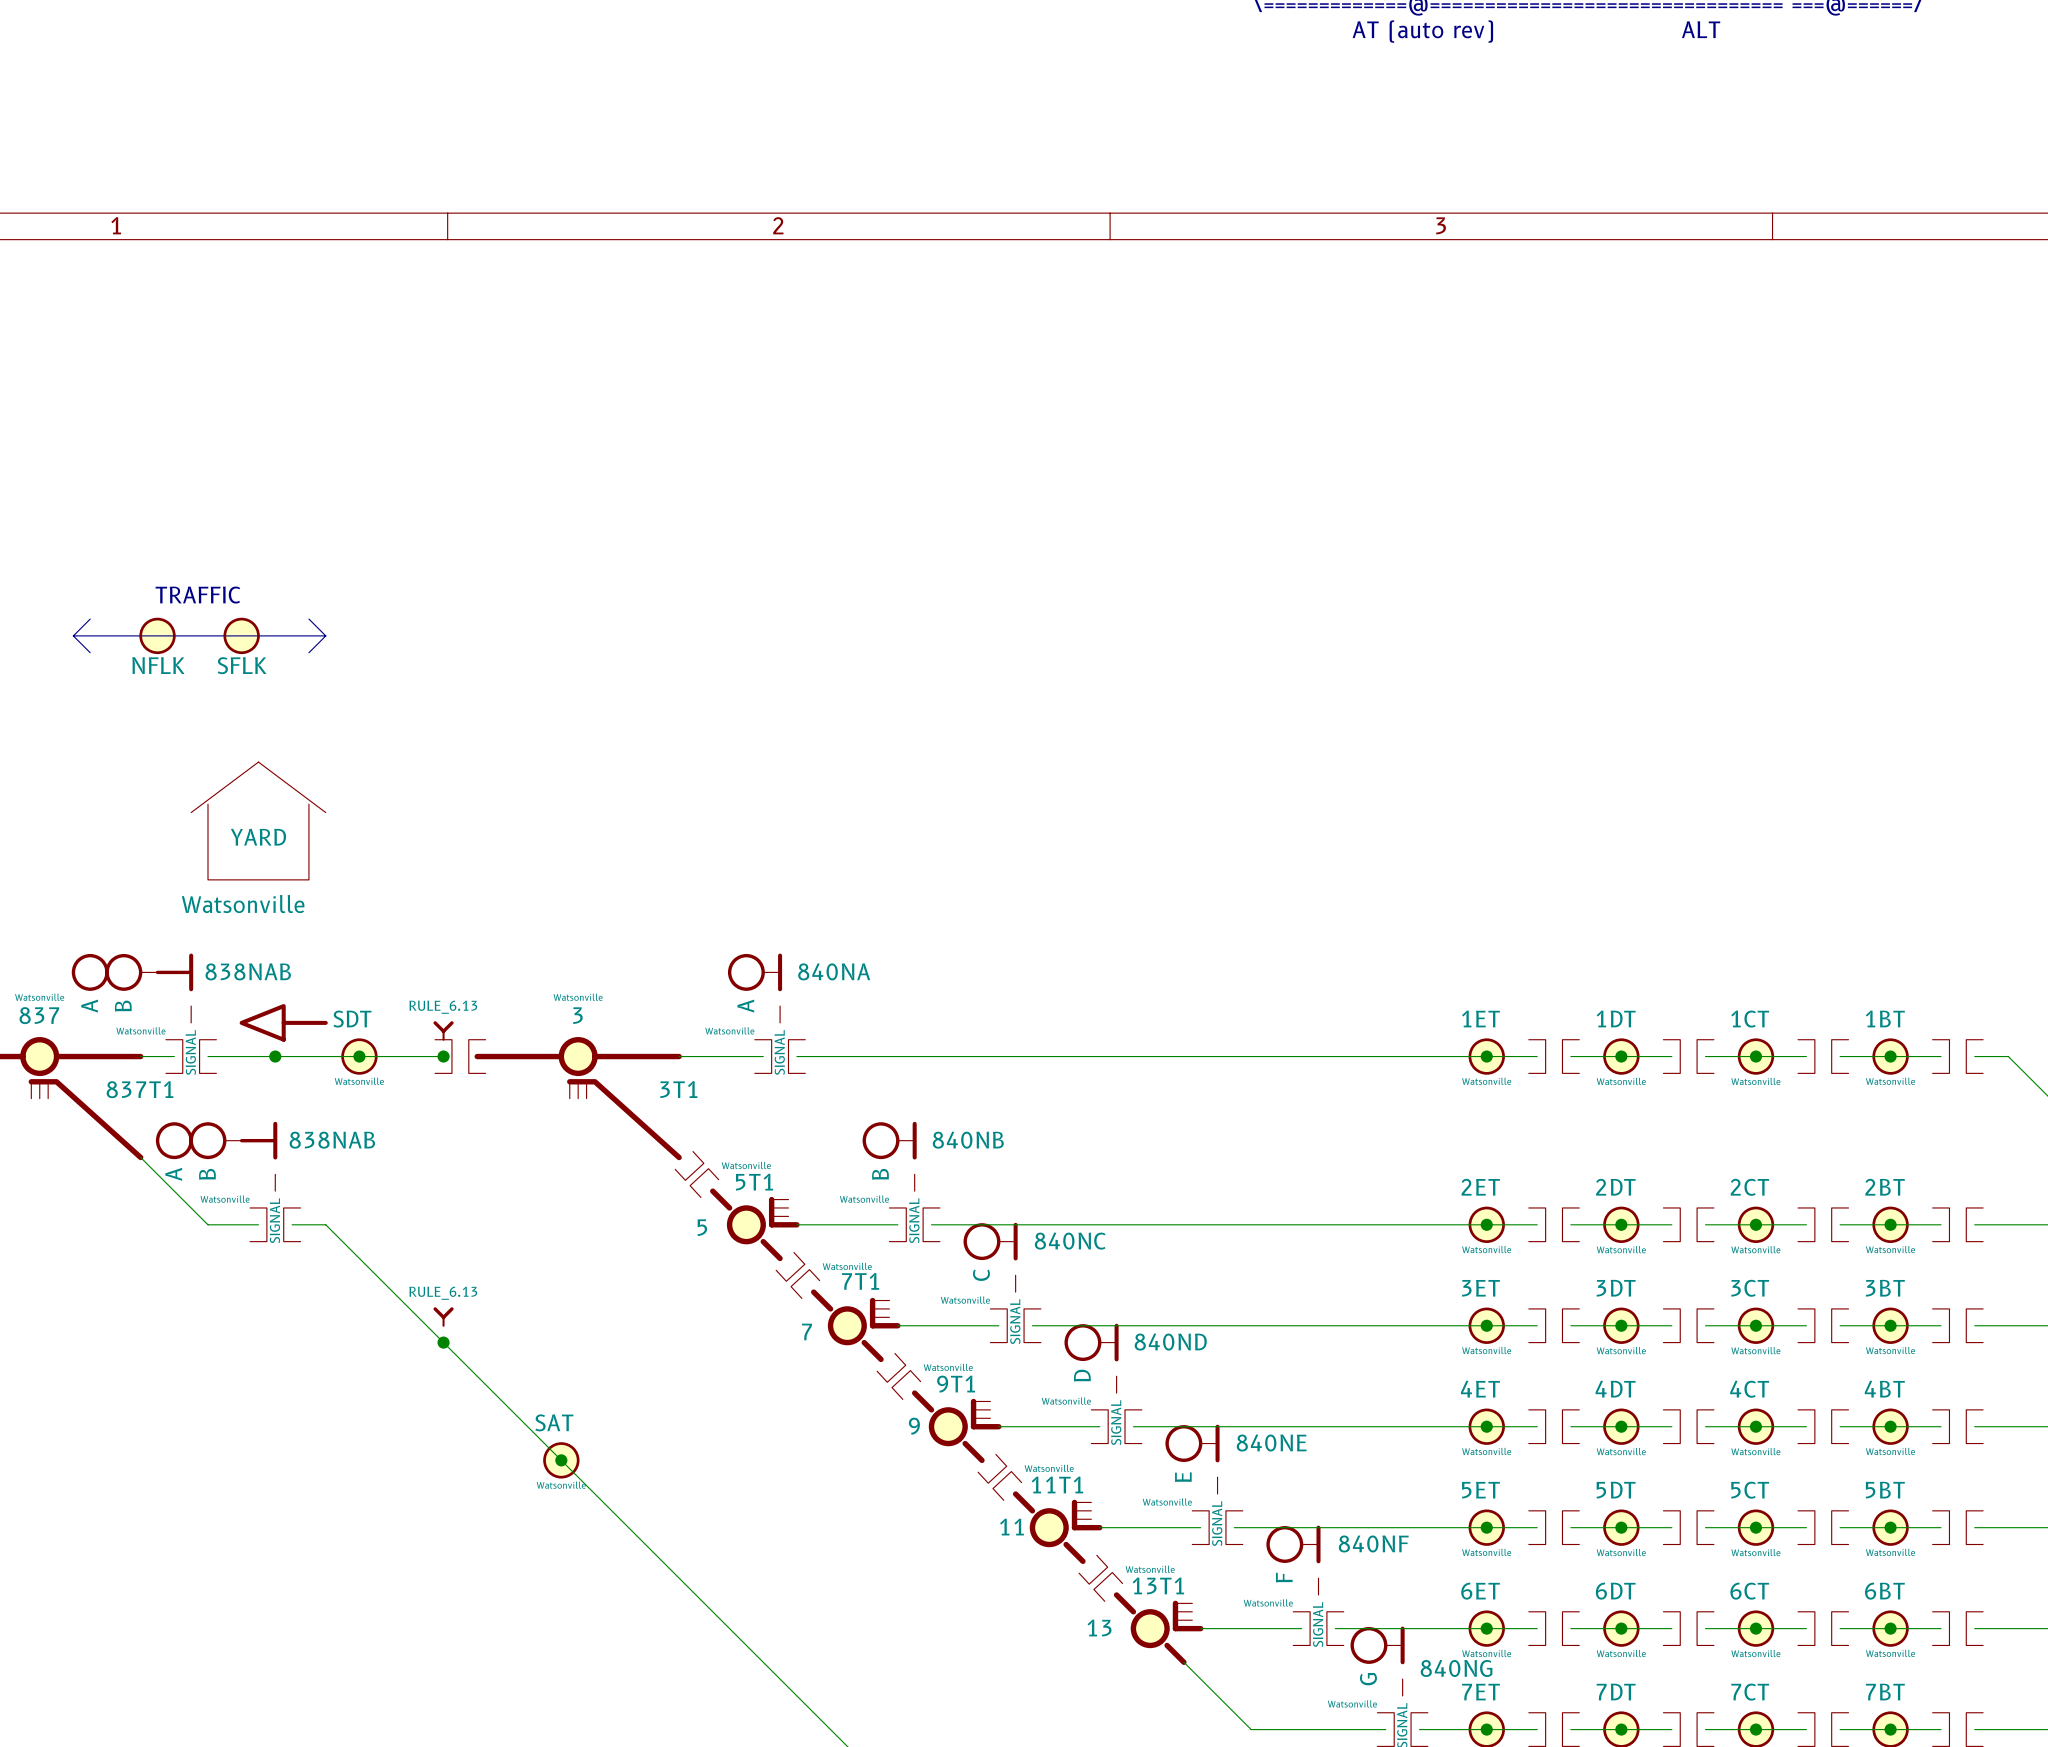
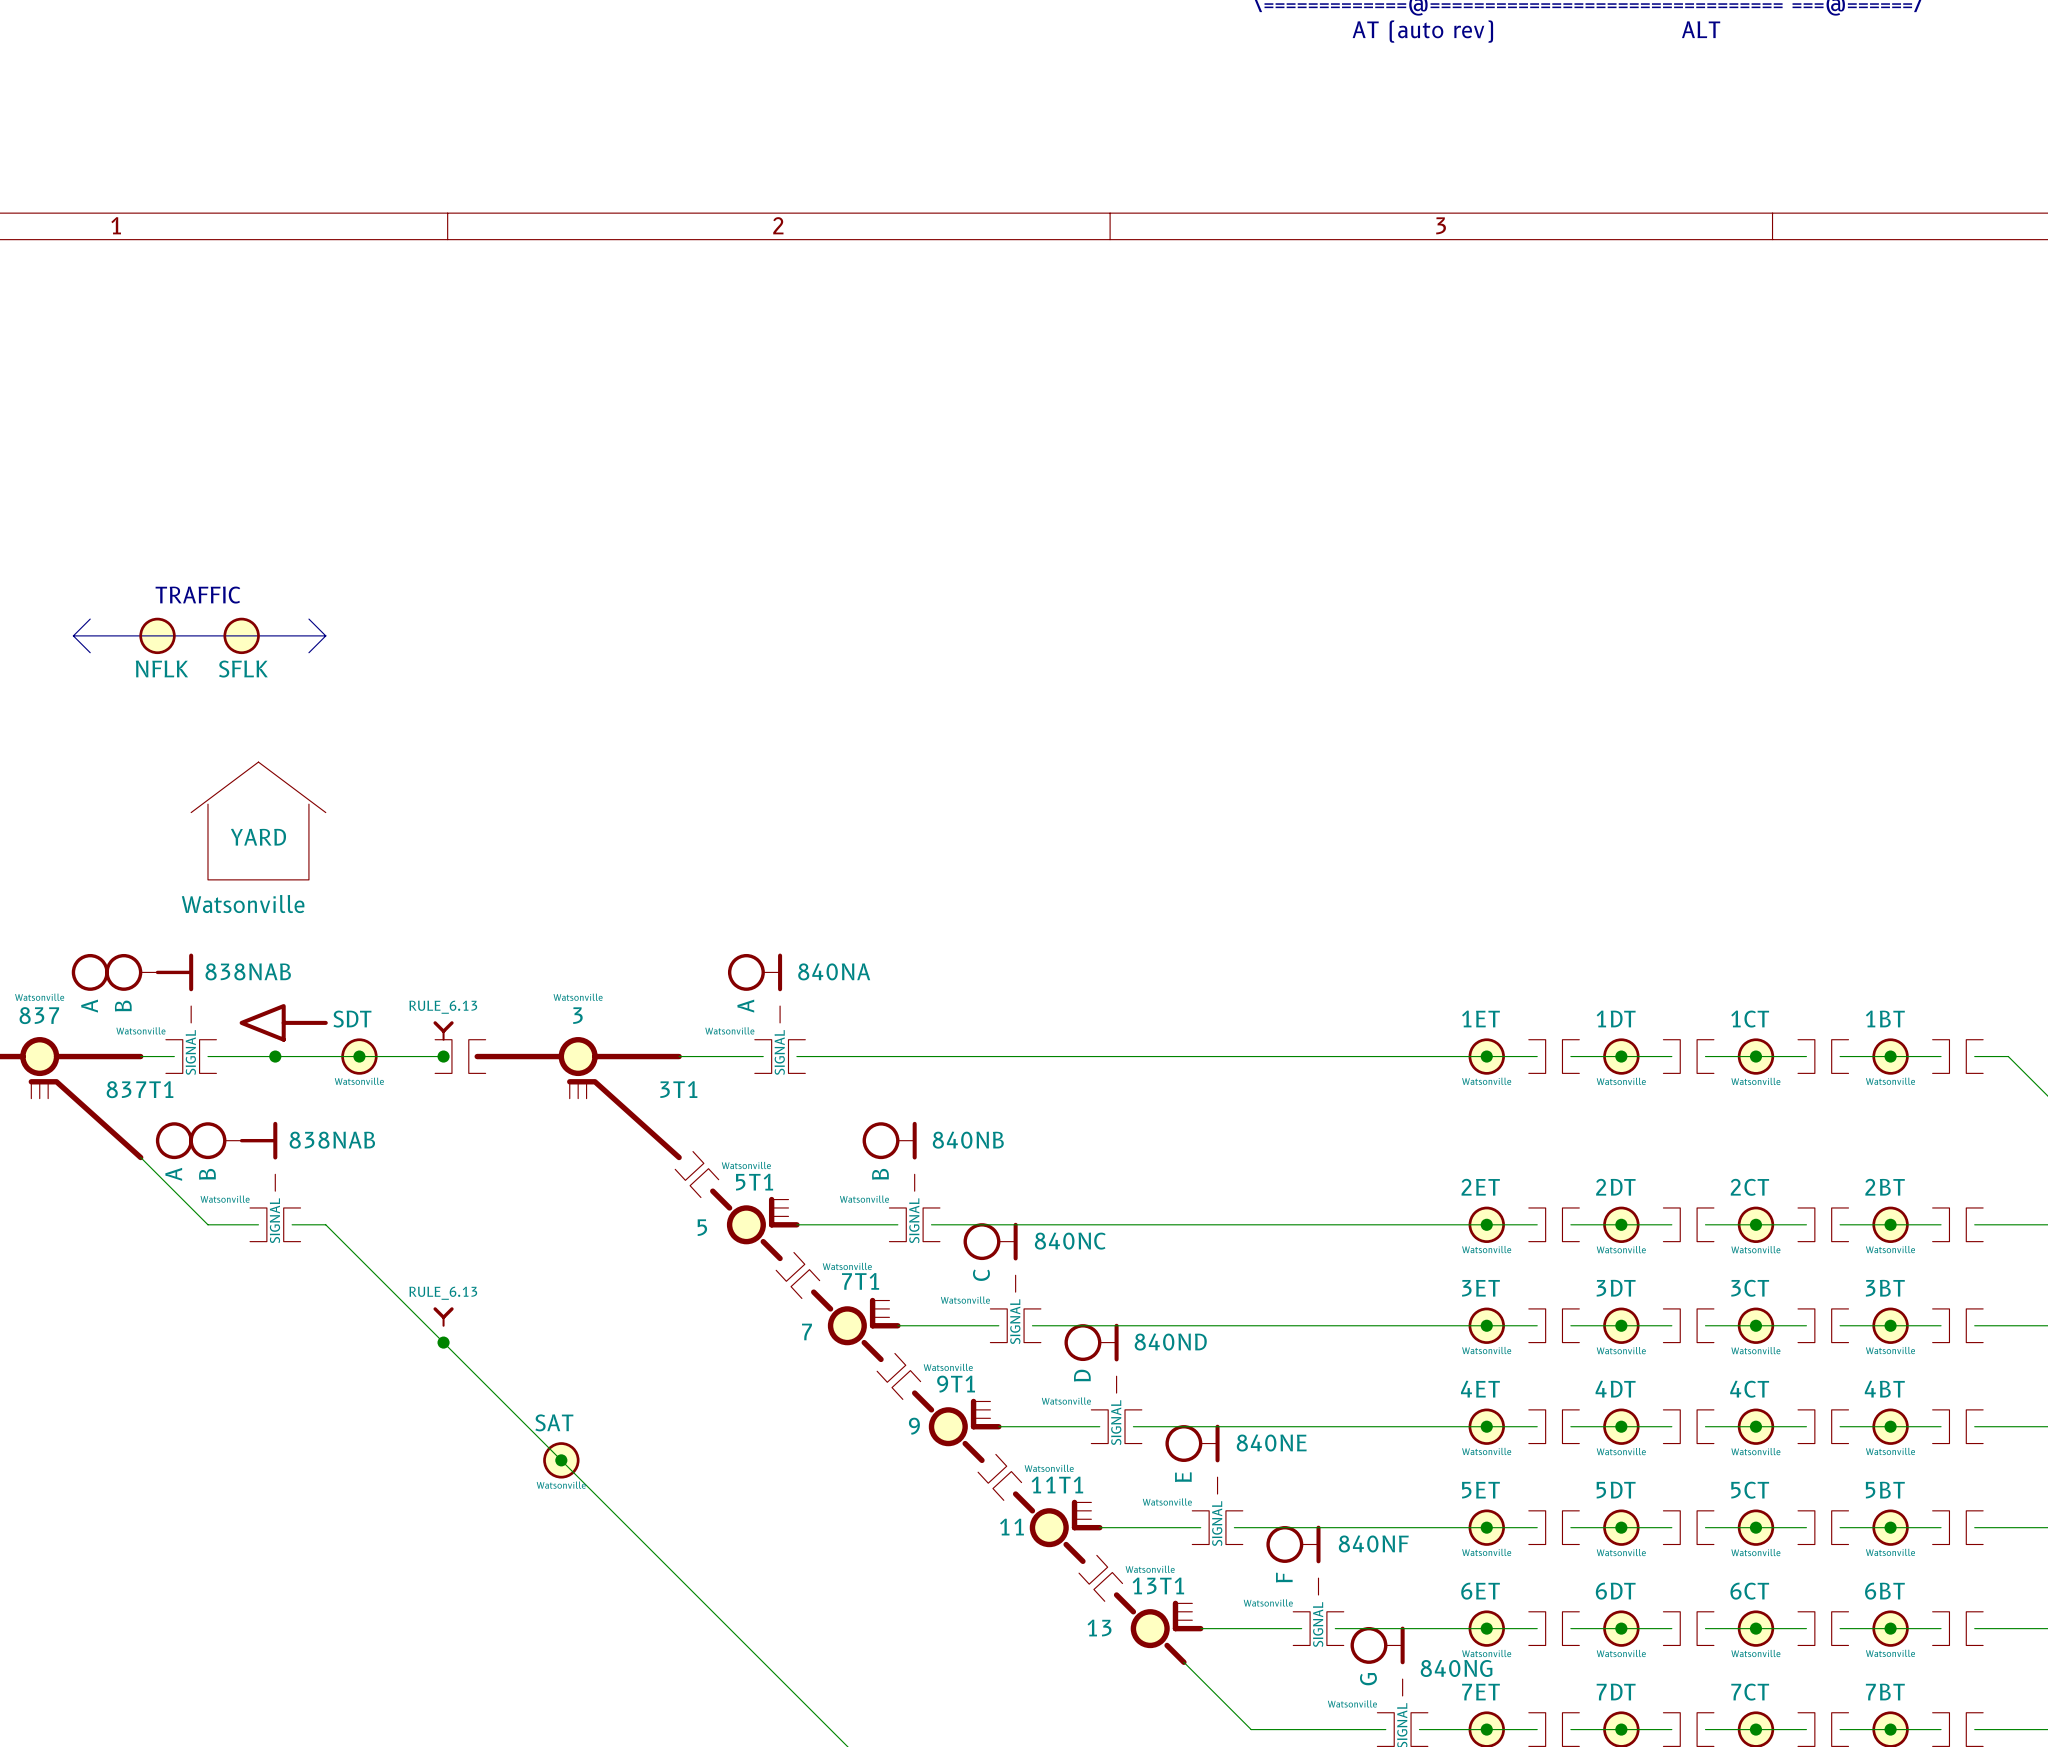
part value position: NFLK (158, 665) -> NFLK (161, 668)
part value position: SFLK (242, 665) -> SFLK (243, 669)

